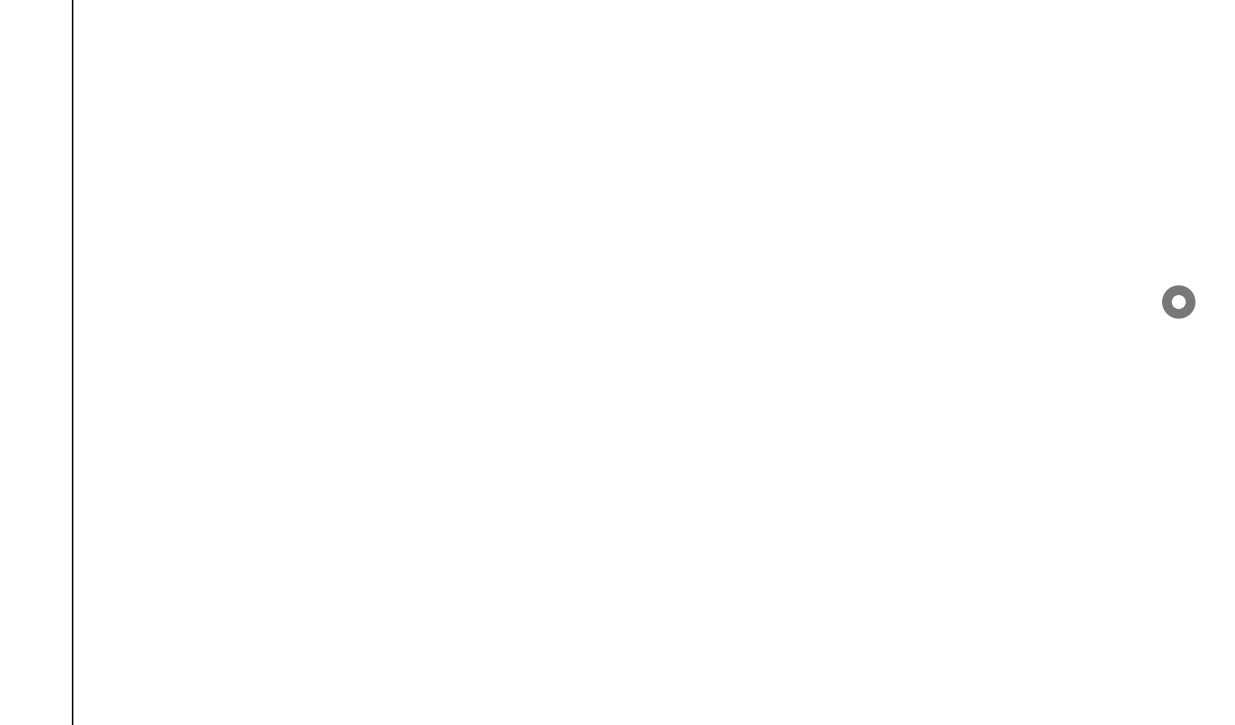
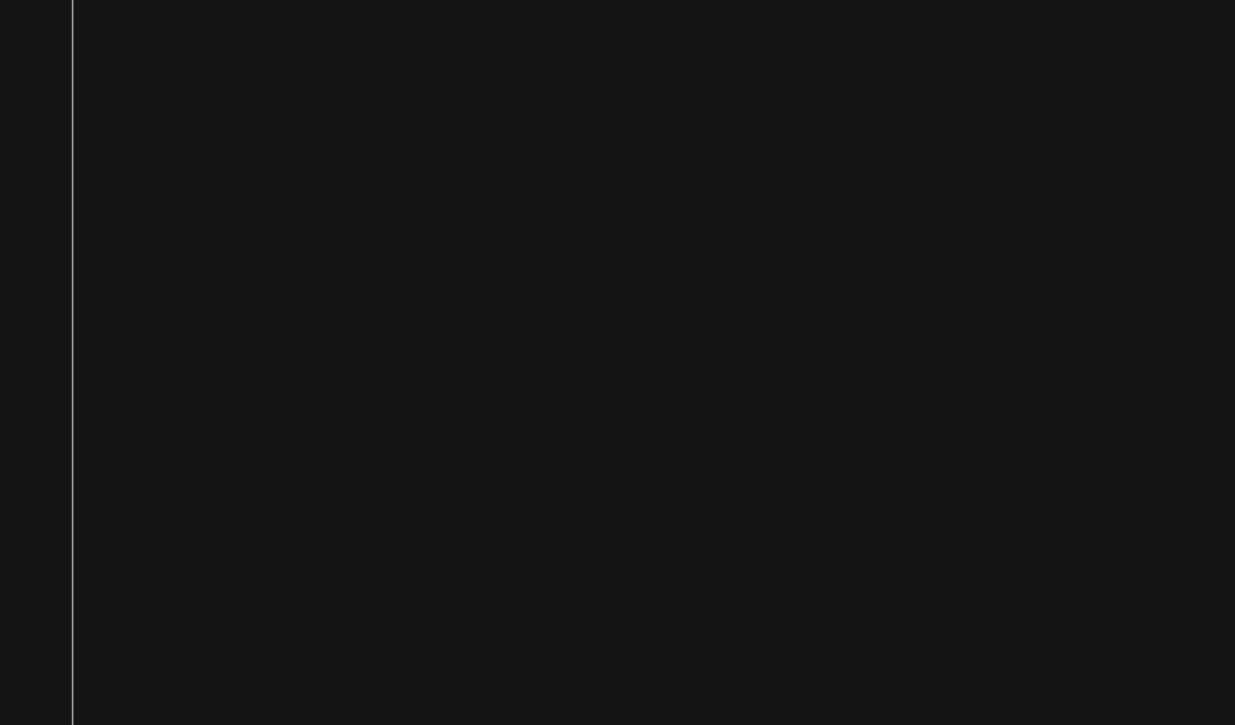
via: (1178, 302) -> none

